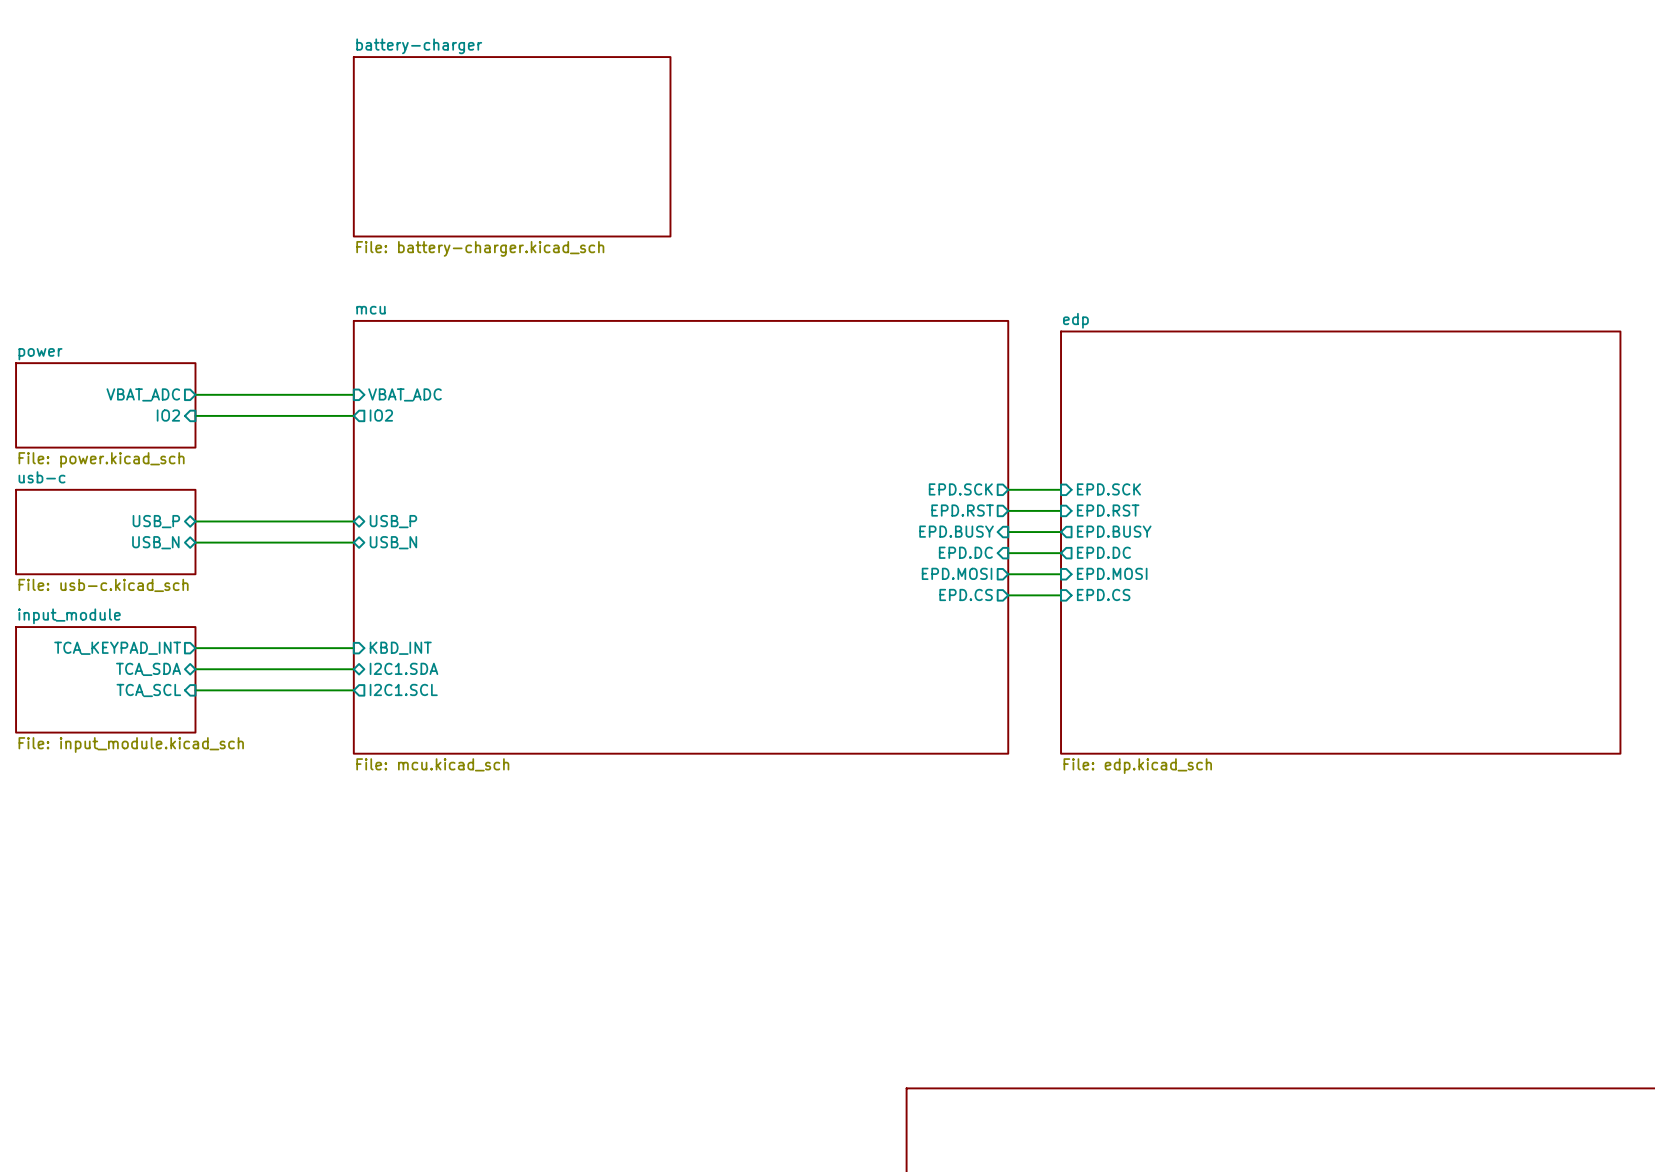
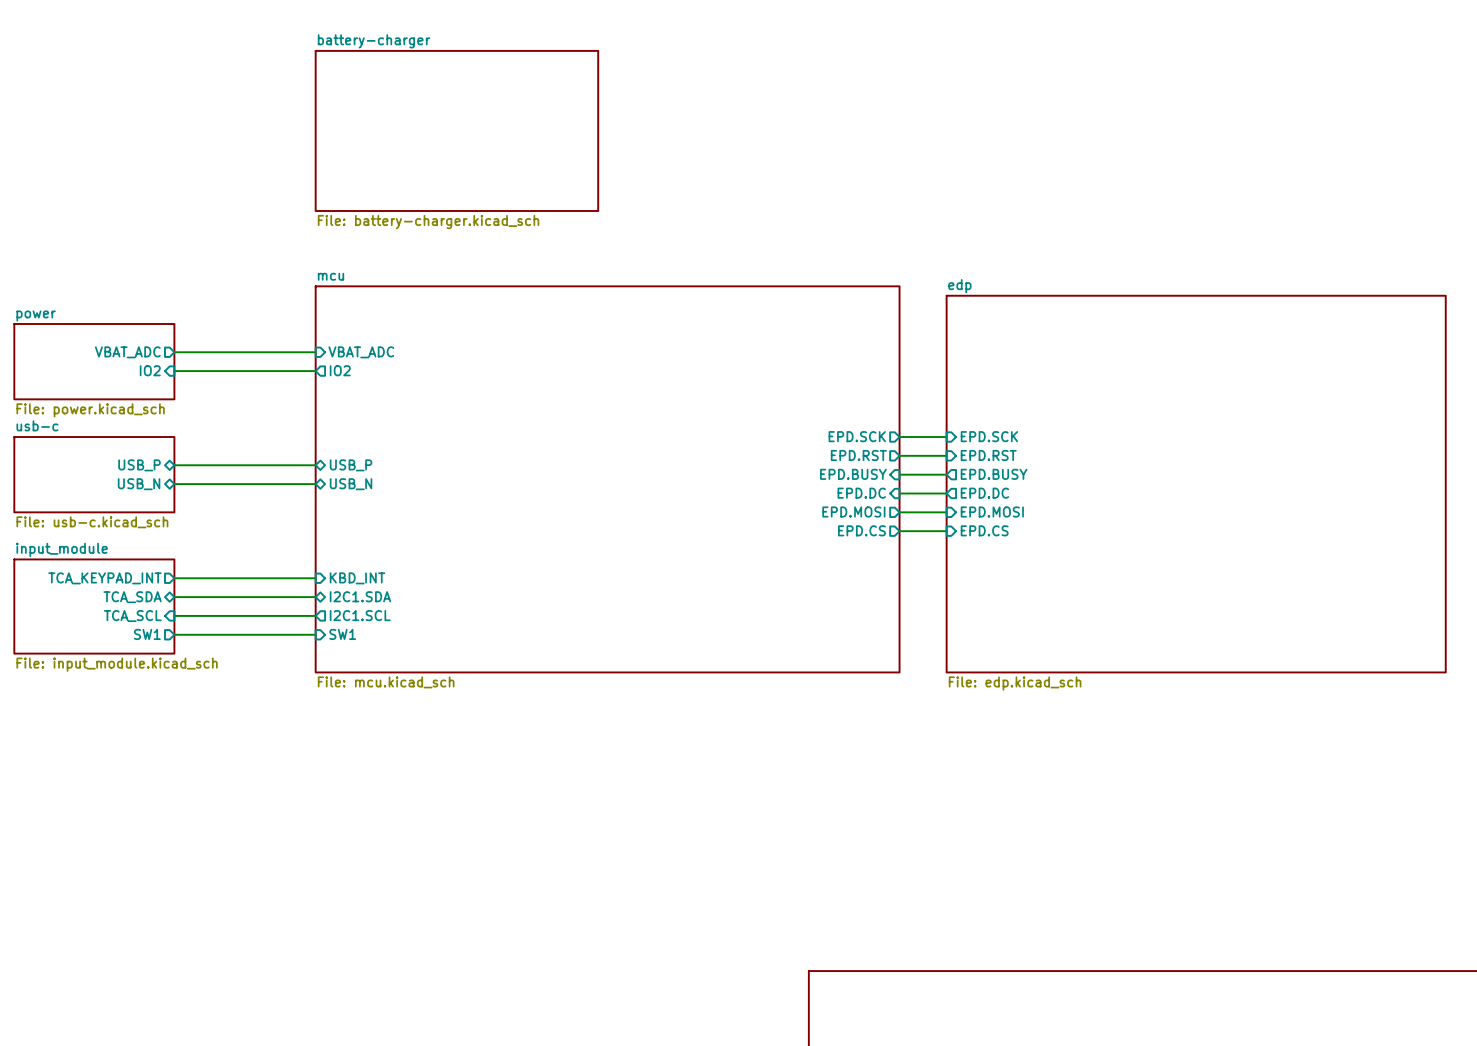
sheet pin: none -> SW1 (147, 634)
wire: none -> (174, 634) (315, 634)
sheet pin: none -> SW1 (342, 634)

